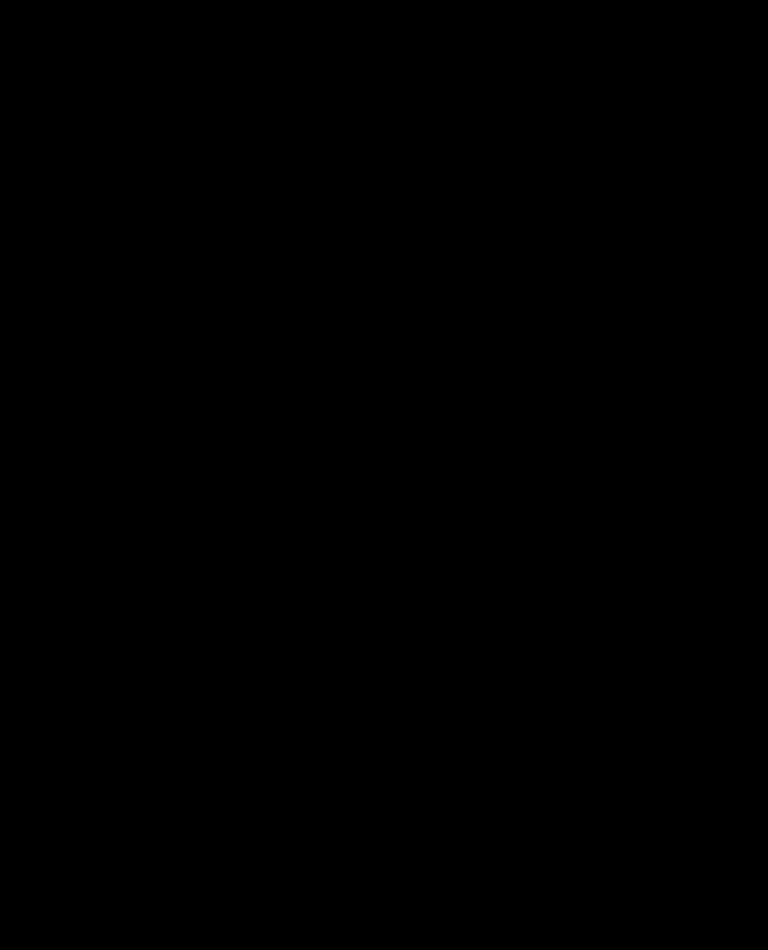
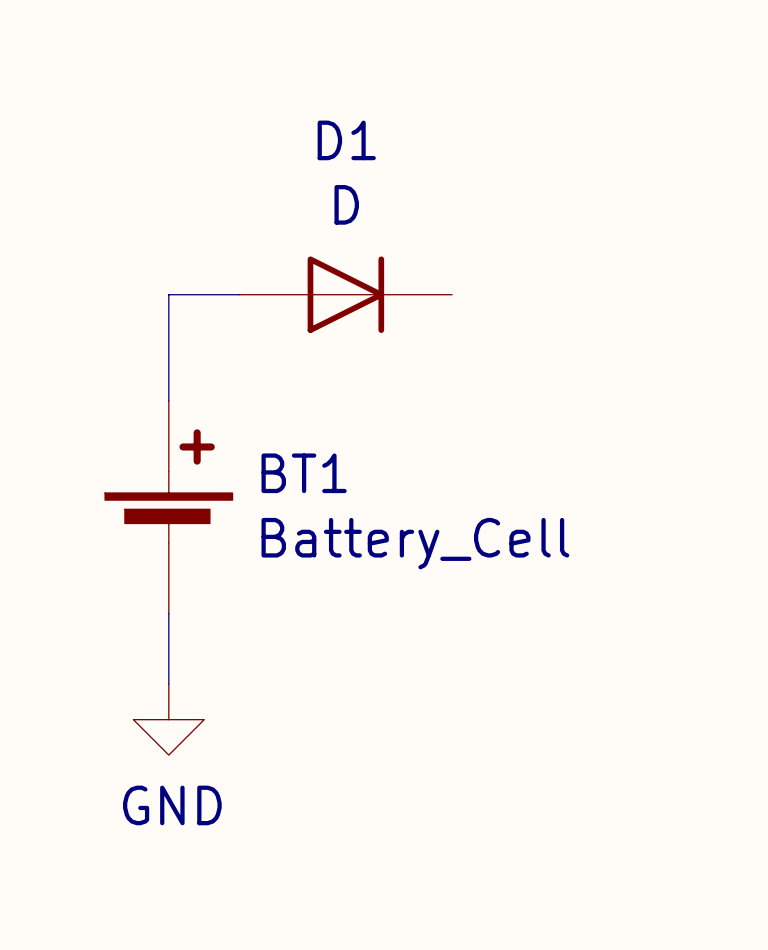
wire: none -> (239, 294) (168, 294) (168, 400)
D1: none -> D (345, 294)
BT1: none -> Battery_Cell (168, 507)
wire: none -> (168, 613) (168, 684)
power symbol: none -> GND (168, 719)

